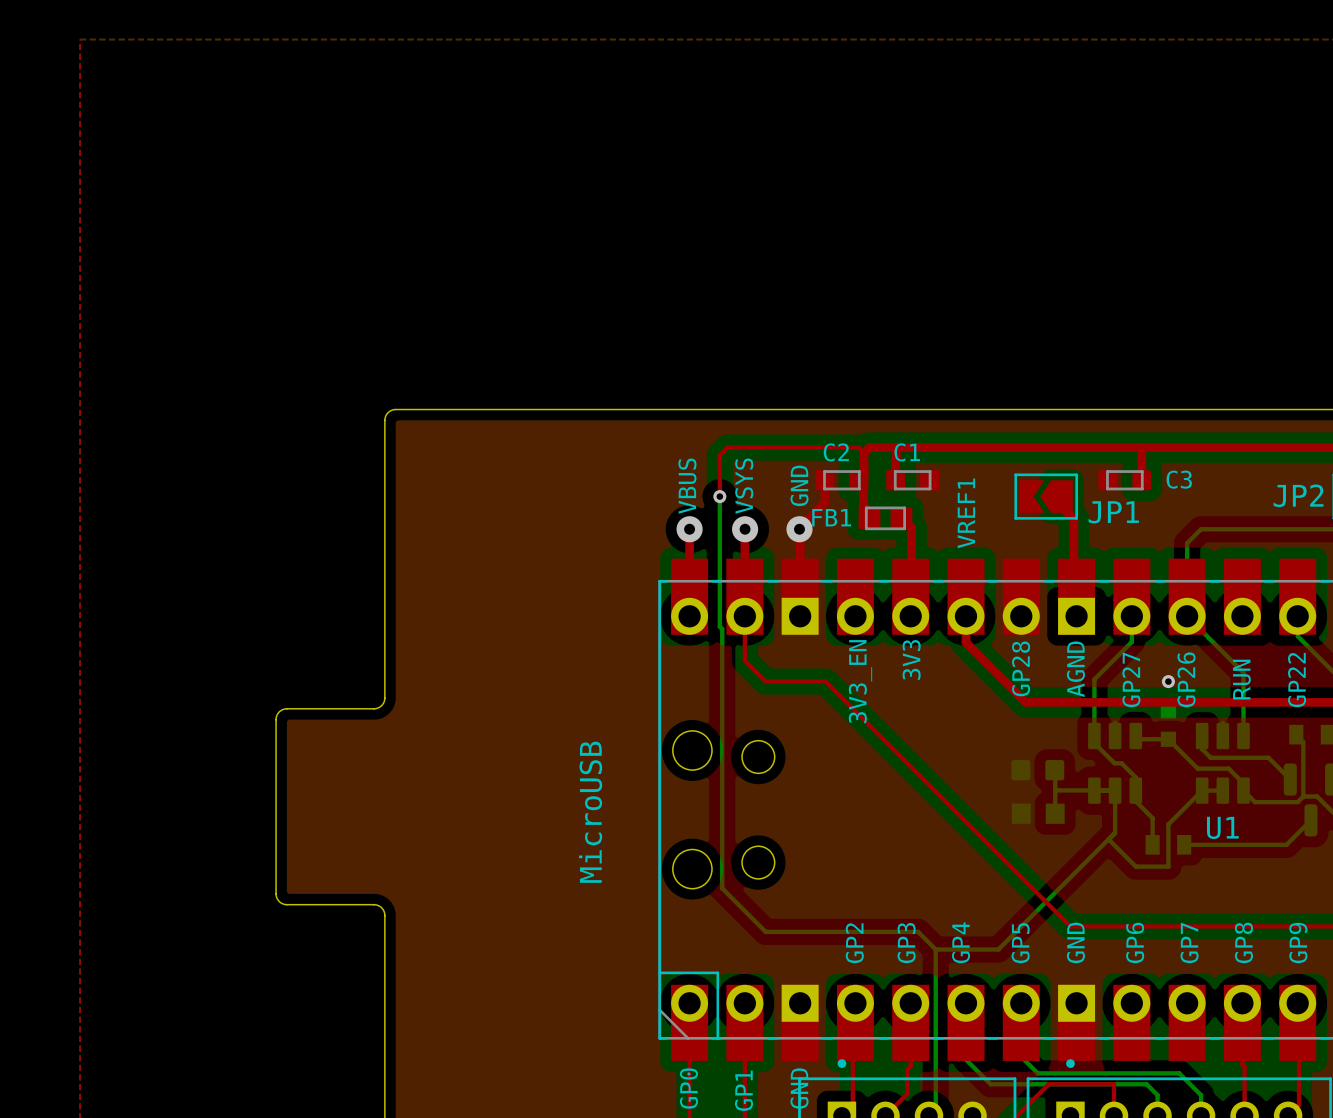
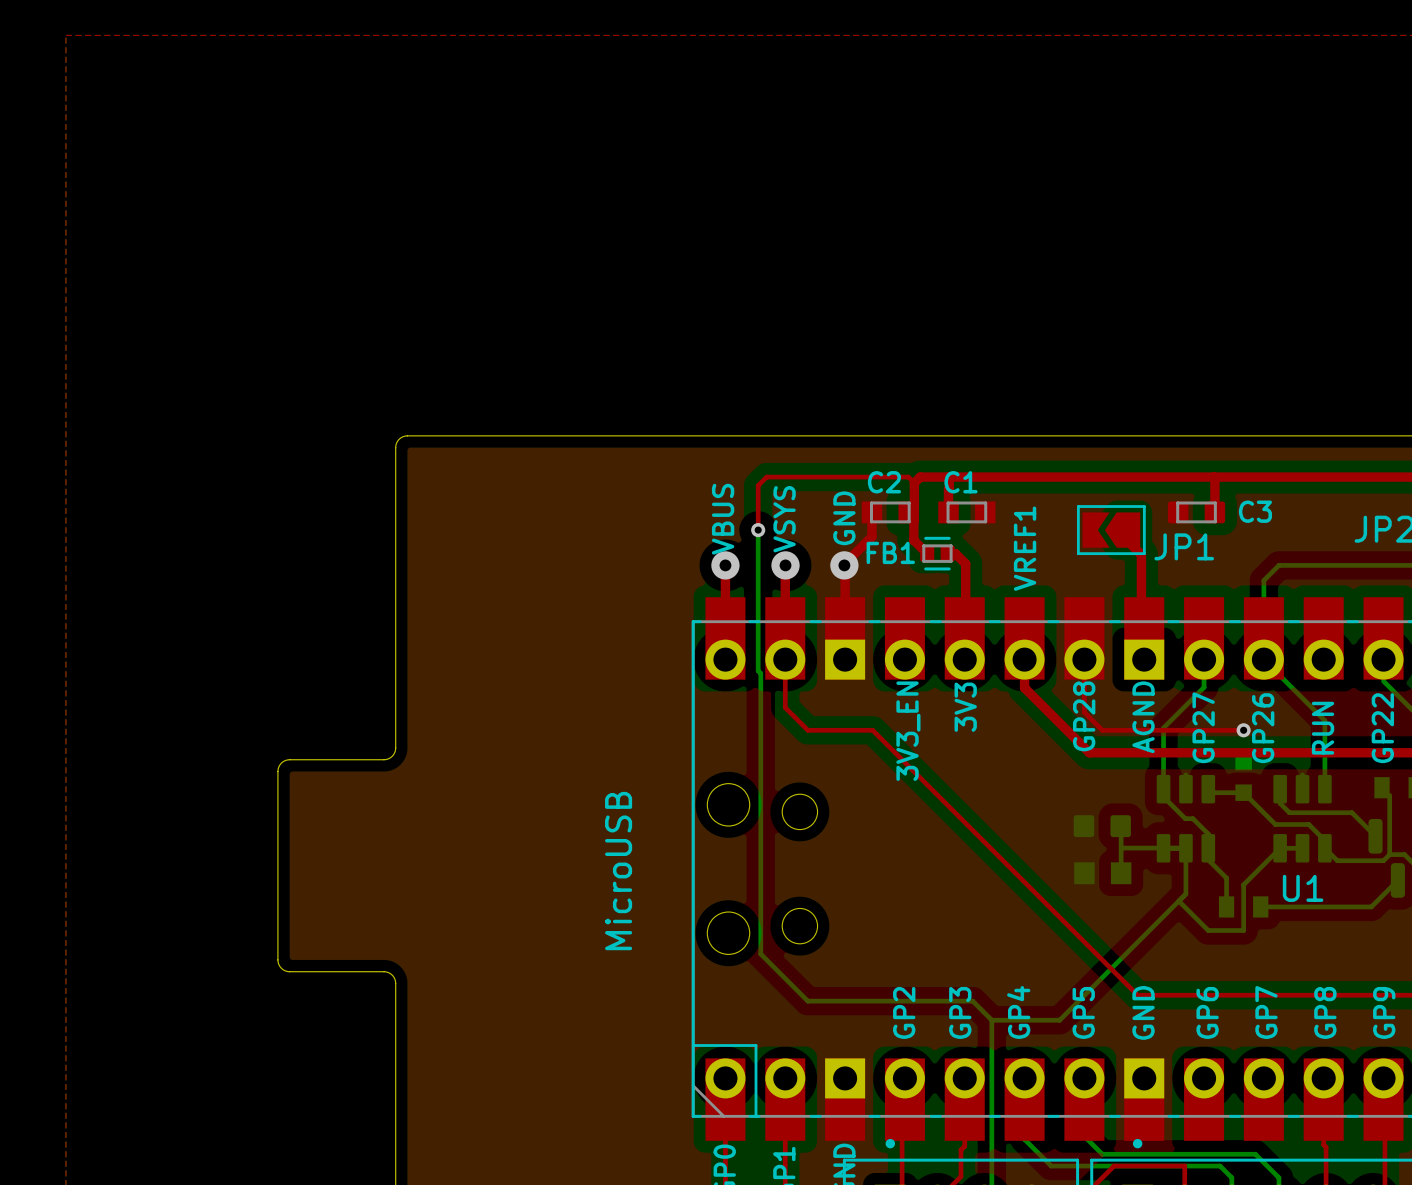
FB1 footprint: [858, 506, 913, 531] -> [920, 536, 955, 571]
top track: none -> (1084, 659) (1084, 712) (1102, 730) (1243, 730)

